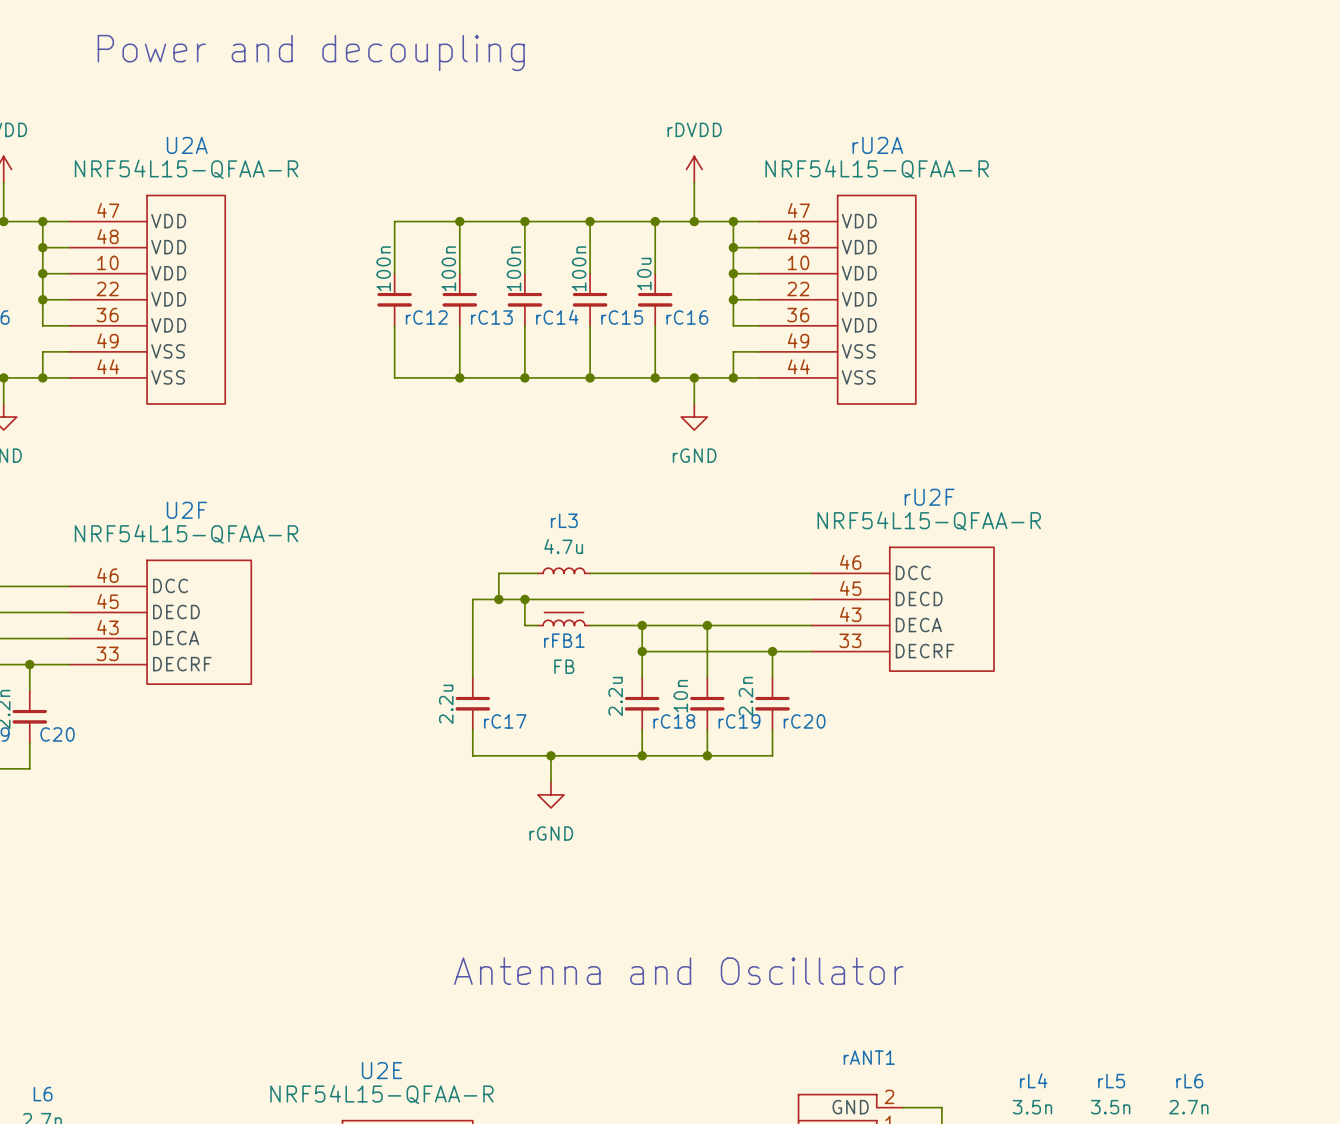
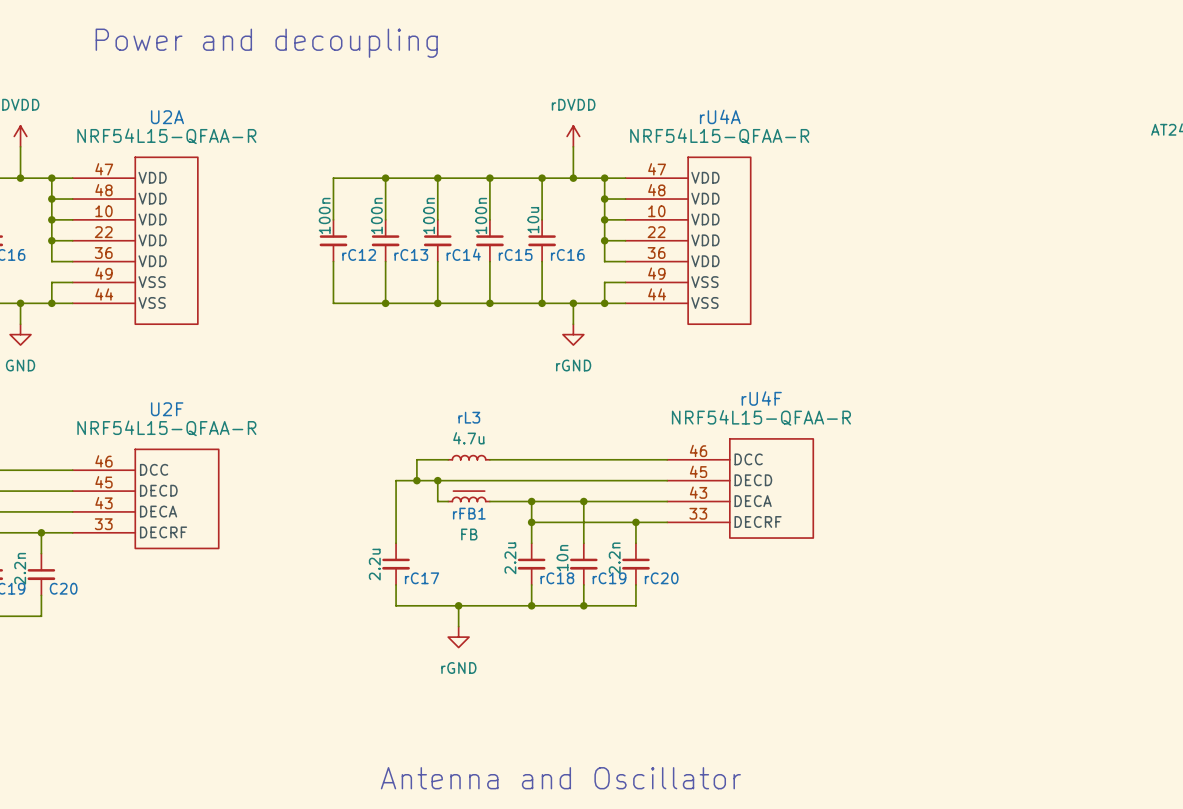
rU2A name: rU2A (877, 145) -> rU4A (720, 116)
rU2F name: rU2F (929, 497) -> rU4F (761, 398)

